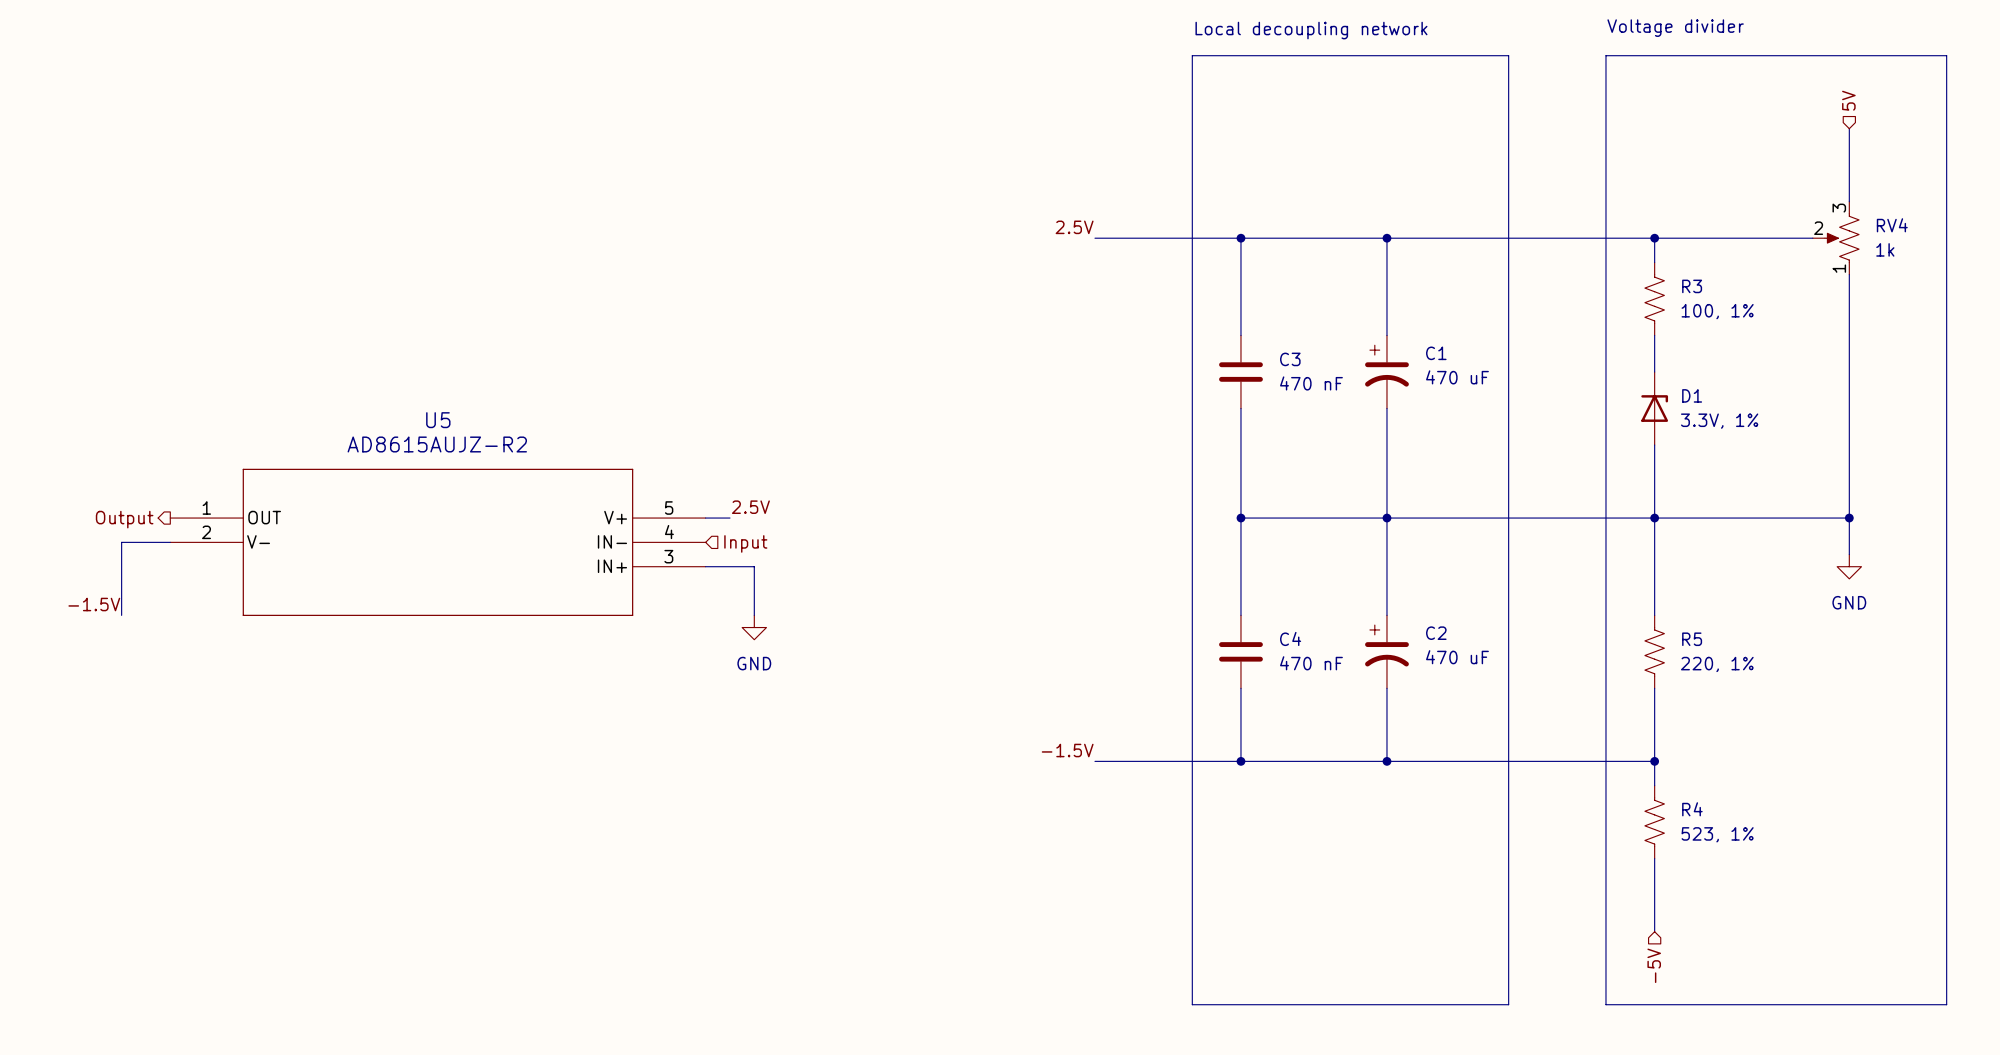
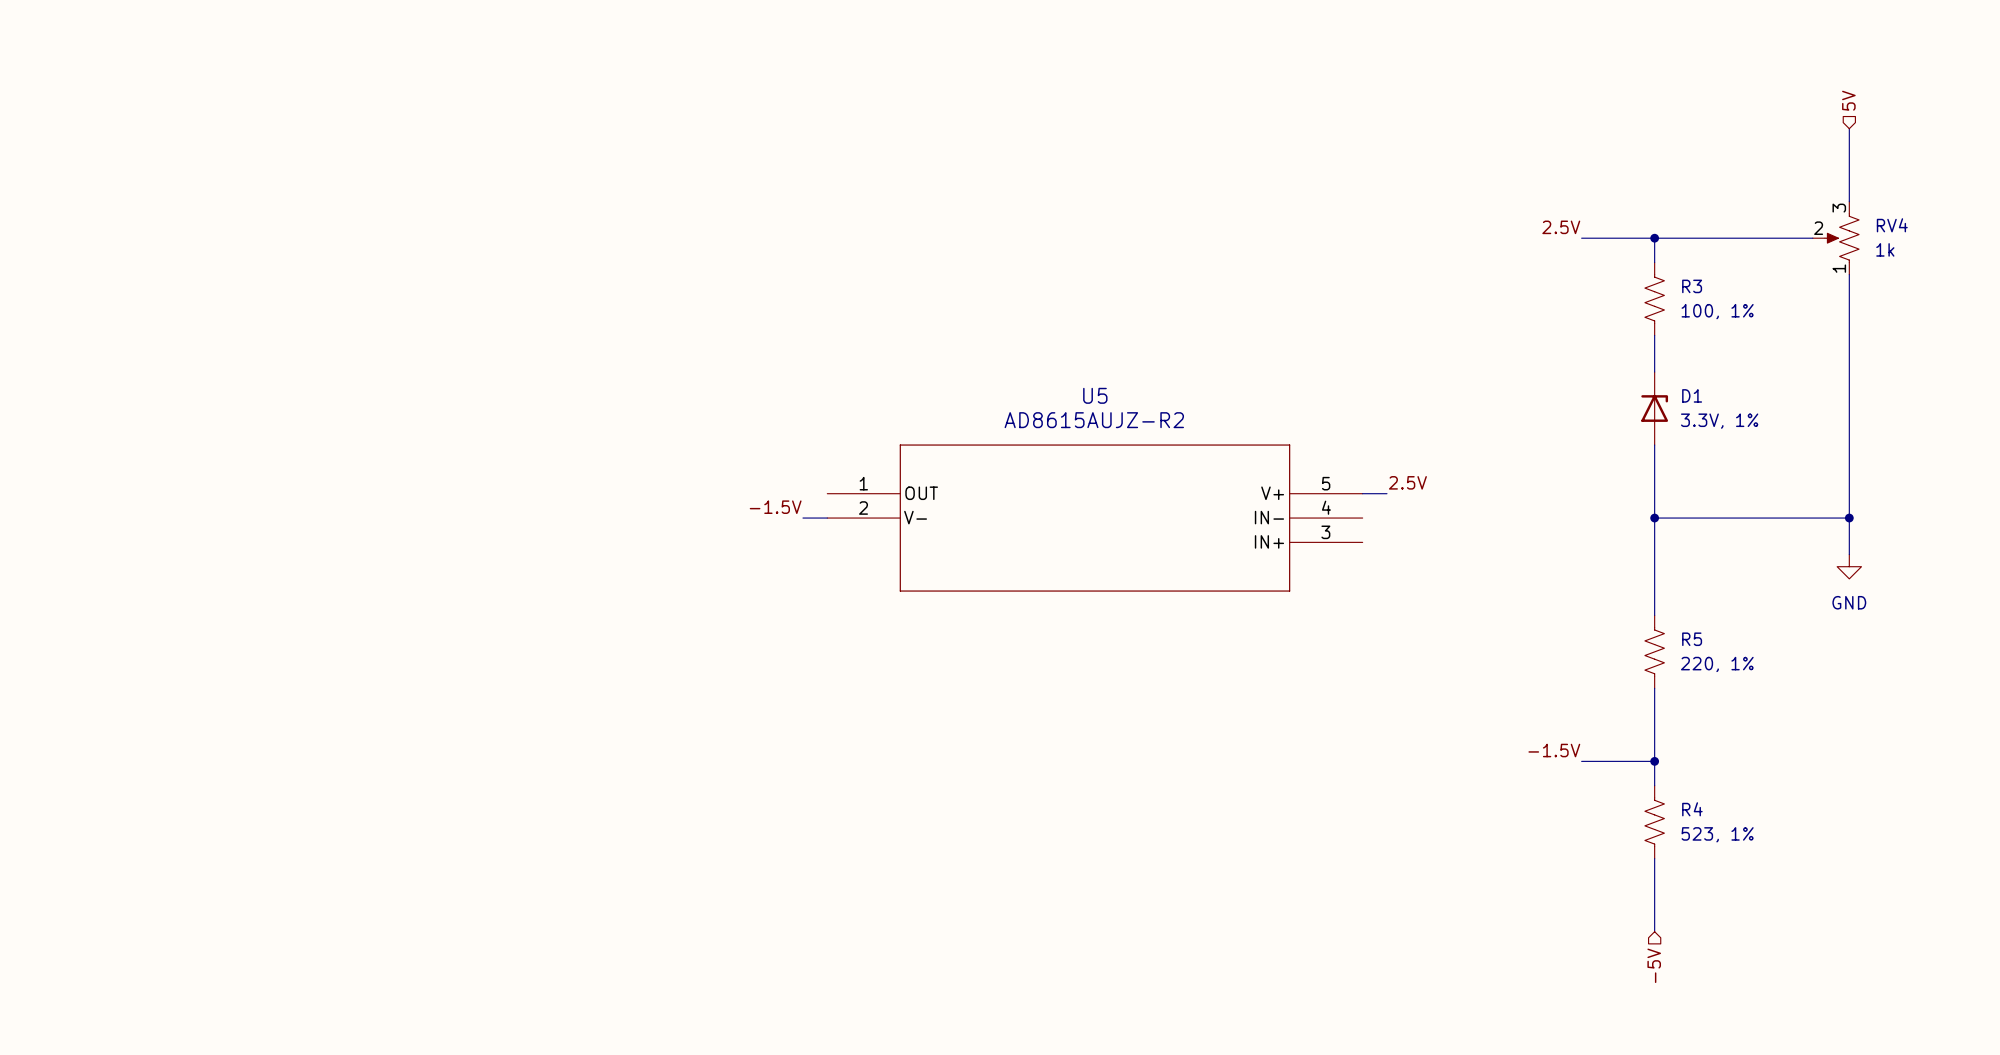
text: Voltage divider (1675, 28) -> none
text: Local decoupling network (1311, 30) -> none
line: (1192, 55) (1508, 55) (1508, 1004) (1192, 1004) (1192, 55) -> none
line: (1605, 55) (1946, 55) (1946, 1004) (1605, 1004) (1605, 55) -> none
label: 2.5V (1074, 227) -> none
label: none -> 2.5V (1561, 227)
wire: (1094, 238) (1581, 238) -> none
wire: (1240, 238) (1240, 335) -> none
junction: (1240, 238) -> none
wire: (1386, 238) (1386, 335) -> none
junction: (1386, 238) -> none
C3: 470 nF (1240, 372) -> none
C1: 470 uF (1386, 372) -> none
wire: (1240, 408) (1240, 615) -> none
wire: (1386, 408) (1386, 615) -> none
label: none -> 2.5V (1407, 482)
wire: none -> (1362, 493) (1386, 493)
label: 2.5V (750, 507) -> -1.5V (775, 507)
wire: (705, 518) (729, 518) -> (802, 518) (827, 518)
wire: (1240, 518) (1654, 518) -> none
junction: (1240, 518) -> none
junction: (1386, 518) -> none
hierarchical label: Output (124, 519) -> none
wire: (170, 542) (121, 542) (121, 615) -> none
U5 position: (437, 542) -> (1094, 518)
hierarchical label: Input (745, 543) -> none
wire: (705, 566) (754, 566) (754, 615) -> none
label: -1.5V (94, 604) -> none
power symbol: GND (754, 627) -> none
C4: 470 nF (1240, 651) -> none
C2: 470 uF (1386, 651) -> none
wire: (1240, 688) (1240, 761) -> none
wire: (1386, 688) (1386, 761) -> none
label: -1.5V (1067, 750) -> none
label: none -> -1.5V (1554, 750)
wire: (1094, 761) (1581, 761) -> none
junction: (1240, 761) -> none
junction: (1386, 761) -> none

